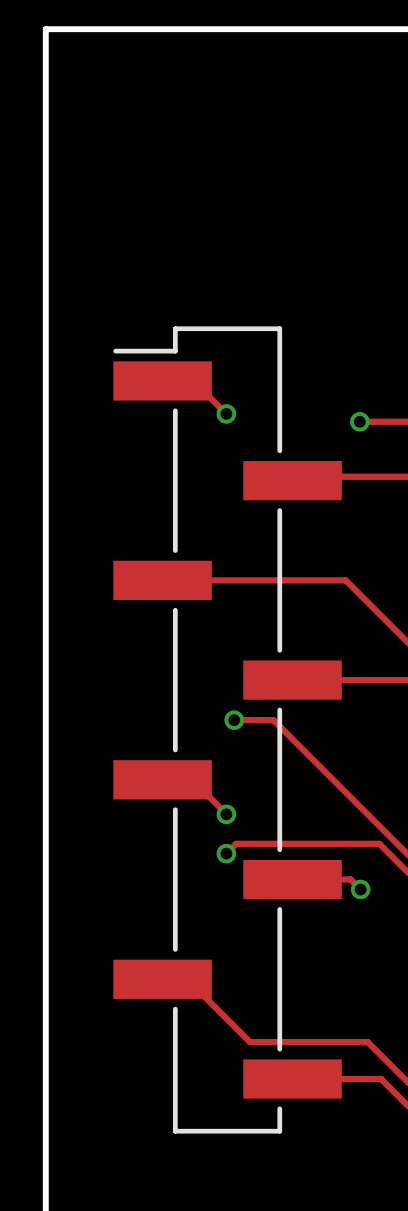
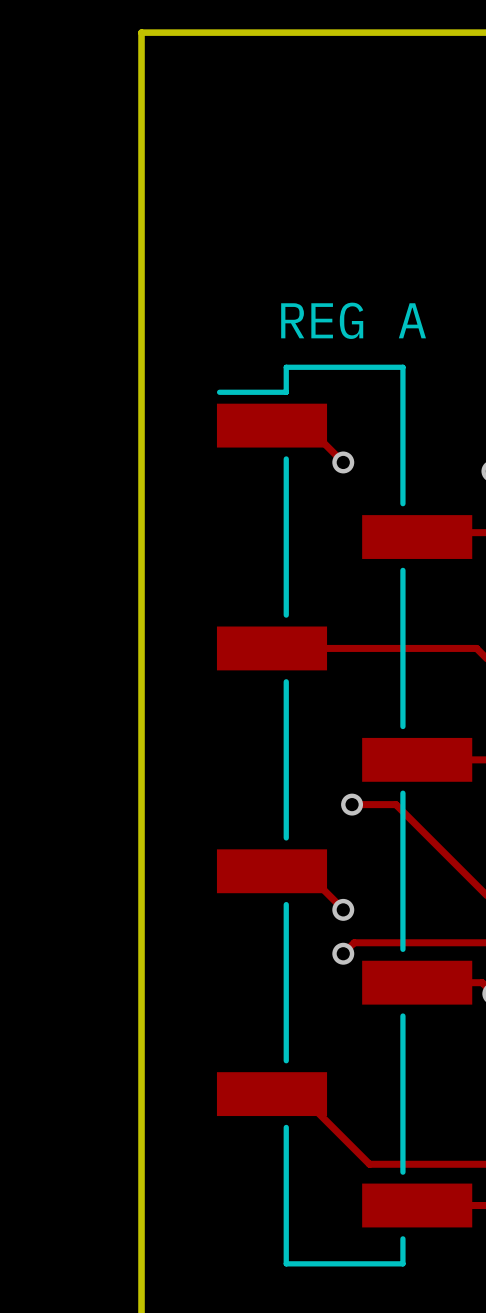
text: none -> REG A (353, 320)

